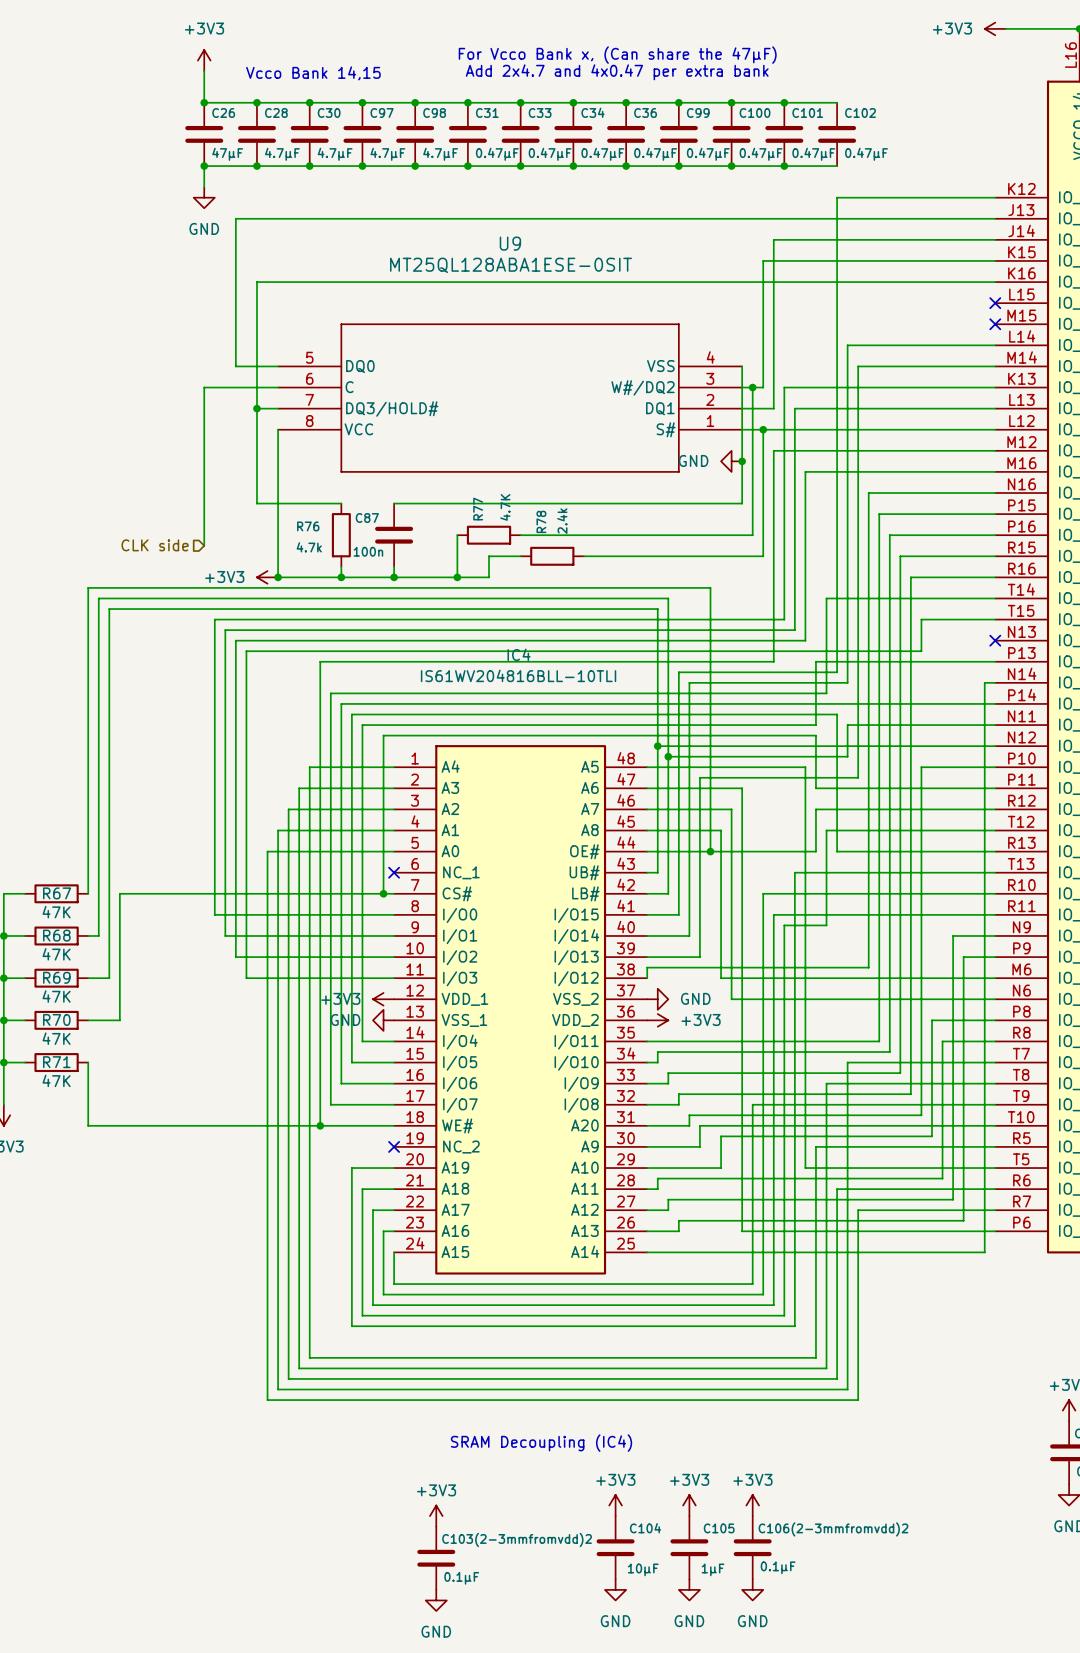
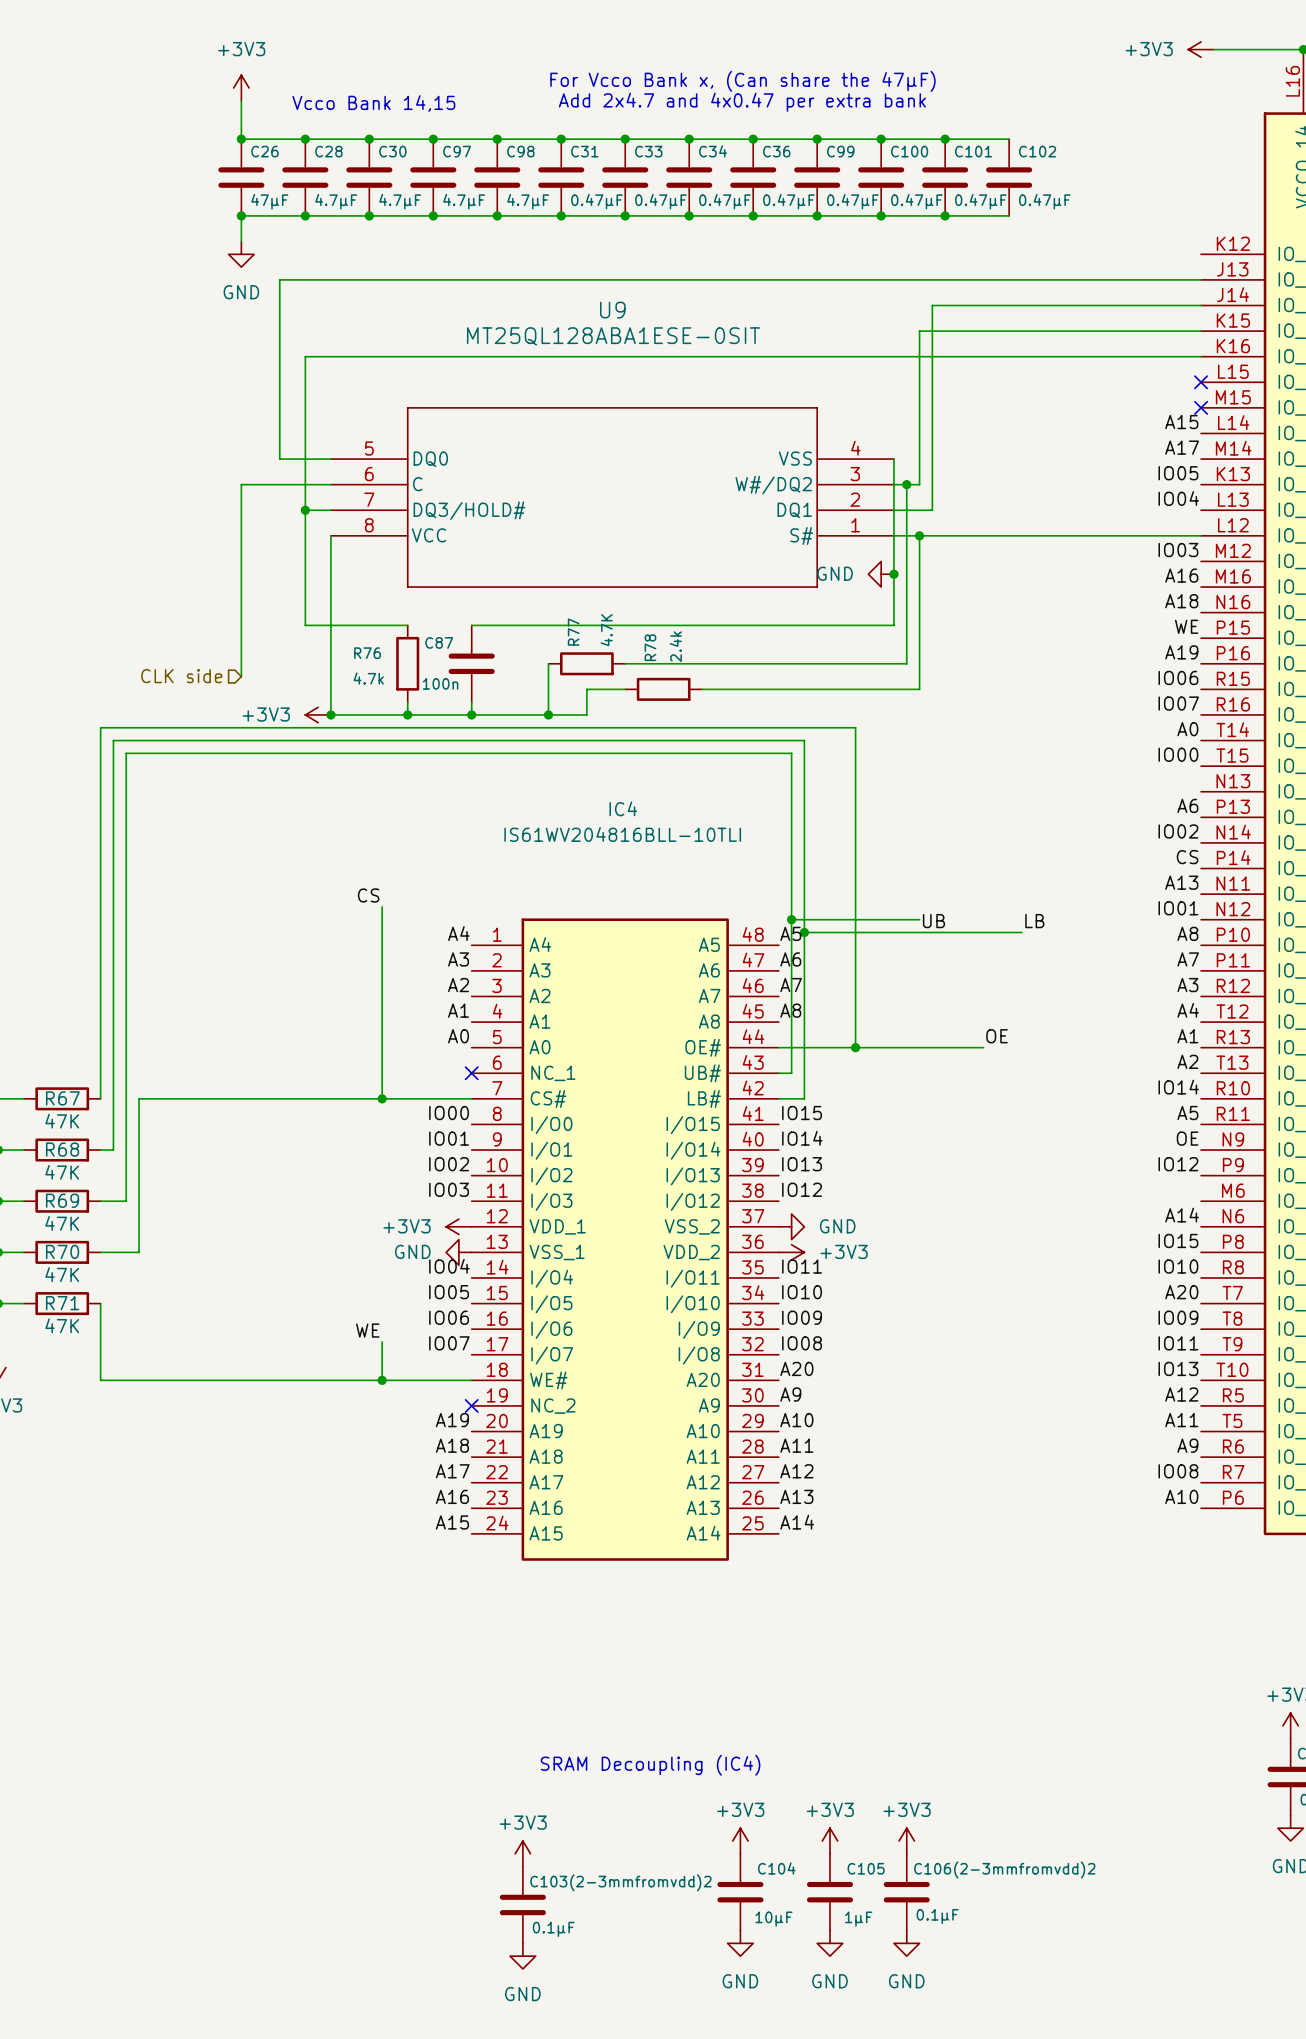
wire: (995, 197) (837, 197) (837, 672) (678, 672) (678, 914) (647, 914) -> none
label: none -> A15 (1181, 422)
wire: (995, 345) (847, 345) (847, 682) (689, 682) (689, 935) (647, 935) -> none
label: none -> A17 (1182, 447)
wire: (995, 366) (858, 366) (858, 777) (699, 777) (699, 957) (647, 957) -> none
label: none -> IO05 (1178, 473)
wire: (995, 387) (784, 387) (784, 619) (214, 619) (214, 914) (394, 914) -> none
label: none -> IO04 (1178, 498)
wire: (995, 408) (794, 408) (794, 630) (225, 630) (225, 935) (394, 935) -> none
label: none -> IO03 (1178, 550)
wire: (995, 450) (773, 450) (773, 661) (320, 661) (320, 735) -> none
label: none -> A16 (1181, 575)
wire: (995, 471) (805, 471) (805, 640) (235, 640) (235, 957) (394, 957) -> none
label: none -> A18 (1181, 601)
wire: (995, 493) (868, 493) (868, 967) (647, 967) (647, 978) -> none
label: none -> WE (1186, 626)
wire: (995, 514) (879, 514) (879, 1041) (647, 1041) -> none
label: none -> A19 (1181, 652)
wire: (995, 535) (889, 535) (889, 1052) (657, 1052) (657, 1062) (647, 1062) -> none
label: none -> IO06 (1178, 677)
wire: (995, 556) (900, 556) (900, 1073) (668, 1073) (668, 1083) (647, 1083) -> none
label: none -> IO07 (1178, 703)
wire: (995, 577) (910, 577) (910, 1094) (678, 1094) (678, 1104) (647, 1104) -> none
label: none -> A0 (1187, 729)
wire: (995, 598) (826, 598) (826, 693) (330, 693) (330, 1104) (394, 1104) -> none
label: none -> IO00 (1178, 754)
wire: (995, 619) (921, 619) (921, 651) (246, 651) (246, 978) (394, 978) -> none
no-connect mark: (995, 640) -> none
label: none -> A6 (1187, 805)
wire: (995, 661) (815, 661) (815, 725) (362, 725) (362, 1041) (394, 1041) -> none
label: none -> IO02 (1178, 831)
wire: (995, 682) (984, 682) (984, 1252) (647, 1252) -> none
label: none -> CS (1187, 857)
wire: (995, 703) (341, 703) (341, 1083) (394, 1083) -> none
label: none -> A13 (1181, 882)
wire: (995, 725) (847, 725) (847, 756) -> none
label: none -> CS (368, 895)
label: none -> IO01 (1178, 908)
wire: (763, 746) (995, 746) -> none
label: none -> UB (933, 921)
label: none -> LB (1034, 921)
label: none -> A4 (458, 933)
label: none -> A5 (790, 933)
label: none -> A8 (1187, 933)
wire: (394, 767) (309, 767) (309, 1357) (815, 1357) (815, 1146) (995, 1146) -> none
wire: (647, 767) (805, 767) (805, 1168) (995, 1168) -> none
wire: (995, 767) (921, 767) (921, 1115) (689, 1115) (689, 1125) (647, 1125) -> none
label: none -> A3 (458, 959)
label: none -> A6 (790, 959)
label: none -> A7 (1188, 959)
wire: (394, 788) (299, 788) (299, 1368) (826, 1368) (826, 1083) (995, 1083) -> none
wire: (647, 788) (742, 788) (742, 1231) (995, 1231) -> none
wire: (995, 788) (815, 788) (815, 735) (383, 735) (383, 893) -> none
label: none -> A2 (458, 985)
label: none -> A7 (791, 985)
label: none -> A3 (1187, 985)
wire: (394, 809) (288, 809) (288, 1378) (837, 1378) (837, 1189) (995, 1189) -> none
wire: (647, 809) (731, 809) (731, 999) (995, 999) -> none
wire: (995, 809) (815, 809) (815, 851) -> none
label: none -> A4 (1188, 1010)
label: none -> A1 (458, 1010)
label: none -> A8 (790, 1010)
wire: (394, 830) (278, 830) (278, 1389) (847, 1389) (847, 1062) (995, 1062) -> none
wire: (647, 830) (721, 830) (721, 978) (995, 978) -> none
wire: (995, 830) (826, 830) (826, 925) (784, 925) (784, 1315) (362, 1315) (362, 1189) (394, 1189) -> none
label: none -> A0 (458, 1036)
label: none -> OE (997, 1036)
label: none -> A1 (1187, 1036)
wire: (394, 851) (267, 851) (267, 1400) (858, 1400) (858, 1210) (995, 1210) -> none
wire: (995, 851) (837, 851) (837, 714) (351, 714) (351, 1062) (394, 1062) -> none
label: none -> A2 (1187, 1061)
wire: (995, 872) (794, 872) (794, 1326) (351, 1326) (351, 1168) (394, 1168) -> none
label: none -> IO14 (1178, 1087)
wire: (320, 893) (320, 1094) -> none
junction: none -> (382, 1098)
junction: (383, 893) -> none
wire: (995, 893) (763, 893) (763, 1294) (383, 1294) (383, 1231) (394, 1231) -> none
label: none -> IO00 (449, 1113)
label: none -> IO15 (802, 1113)
label: none -> A5 (1187, 1113)
wire: (995, 914) (773, 914) (773, 1305) (372, 1305) (372, 1210) (394, 1210) -> none
label: none -> IO01 (449, 1138)
label: none -> IO14 (802, 1138)
label: none -> OE (1187, 1138)
wire: (995, 935) (953, 935) (953, 1199) (668, 1199) (668, 1210) (647, 1210) -> none
label: none -> IO02 (449, 1164)
label: none -> IO13 (802, 1164)
label: none -> IO12 (1178, 1164)
wire: (995, 957) (963, 957) (963, 1220) (678, 1220) (678, 1231) (647, 1231) -> none
label: none -> IO03 (449, 1189)
label: none -> IO12 (802, 1189)
label: none -> A14 (1182, 1215)
label: none -> IO15 (1178, 1240)
wire: (995, 1020) (931, 1020) (931, 1136) (721, 1136) (721, 1168) (647, 1168) -> none
label: none -> IO04 (449, 1266)
label: none -> IO11 (802, 1266)
label: none -> IO10 (1178, 1266)
wire: (995, 1041) (942, 1041) (942, 1178) (657, 1178) (657, 1189) (647, 1189) -> none
label: none -> IO05 (449, 1292)
label: none -> IO10 (802, 1292)
label: none -> A20 (1181, 1292)
label: none -> IO06 (449, 1317)
label: none -> IO09 (802, 1317)
label: none -> IO09 (1178, 1317)
label: none -> WE (367, 1330)
label: none -> IO07 (449, 1343)
label: none -> IO08 (802, 1343)
label: none -> IO11 (1178, 1343)
wire: (995, 1104) (752, 1104) (752, 1284) (394, 1284) (394, 1252) -> none
label: none -> A20 (796, 1368)
label: none -> IO13 (1178, 1368)
wire: (995, 1125) (699, 1125) (699, 1146) (647, 1146) -> none
label: none -> A9 (790, 1394)
label: none -> A12 (1181, 1394)
label: none -> A19 (452, 1420)
label: none -> A10 (796, 1420)
label: none -> A11 (1181, 1420)
label: none -> A18 (452, 1445)
label: none -> A11 (796, 1445)
label: none -> A9 (1187, 1445)
label: none -> A17 (452, 1471)
label: none -> A12 (796, 1471)
label: none -> IO08 (1178, 1471)
label: none -> A16 (452, 1496)
label: none -> A13 (796, 1496)
label: none -> A10 (1181, 1496)
label: none -> A15 (452, 1522)
label: none -> A14 (797, 1522)

